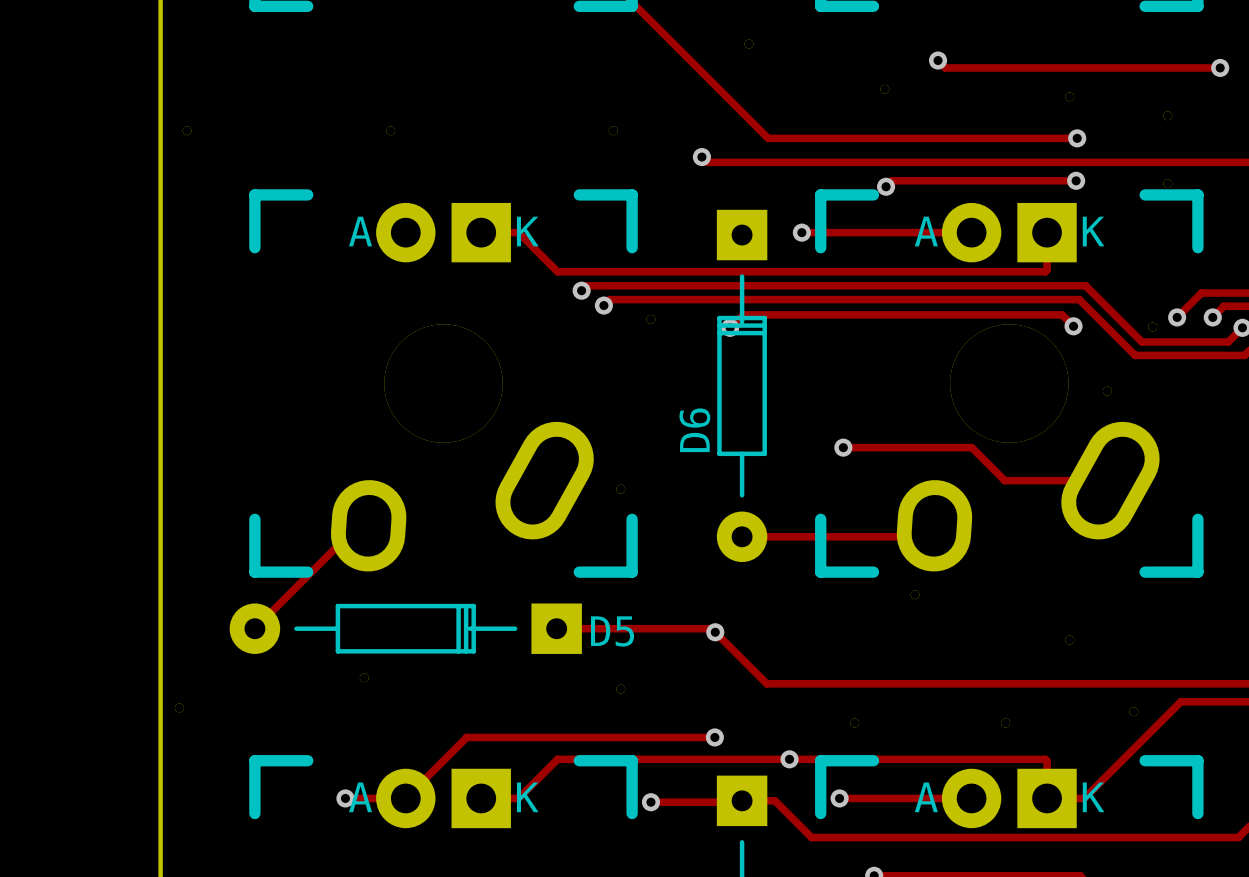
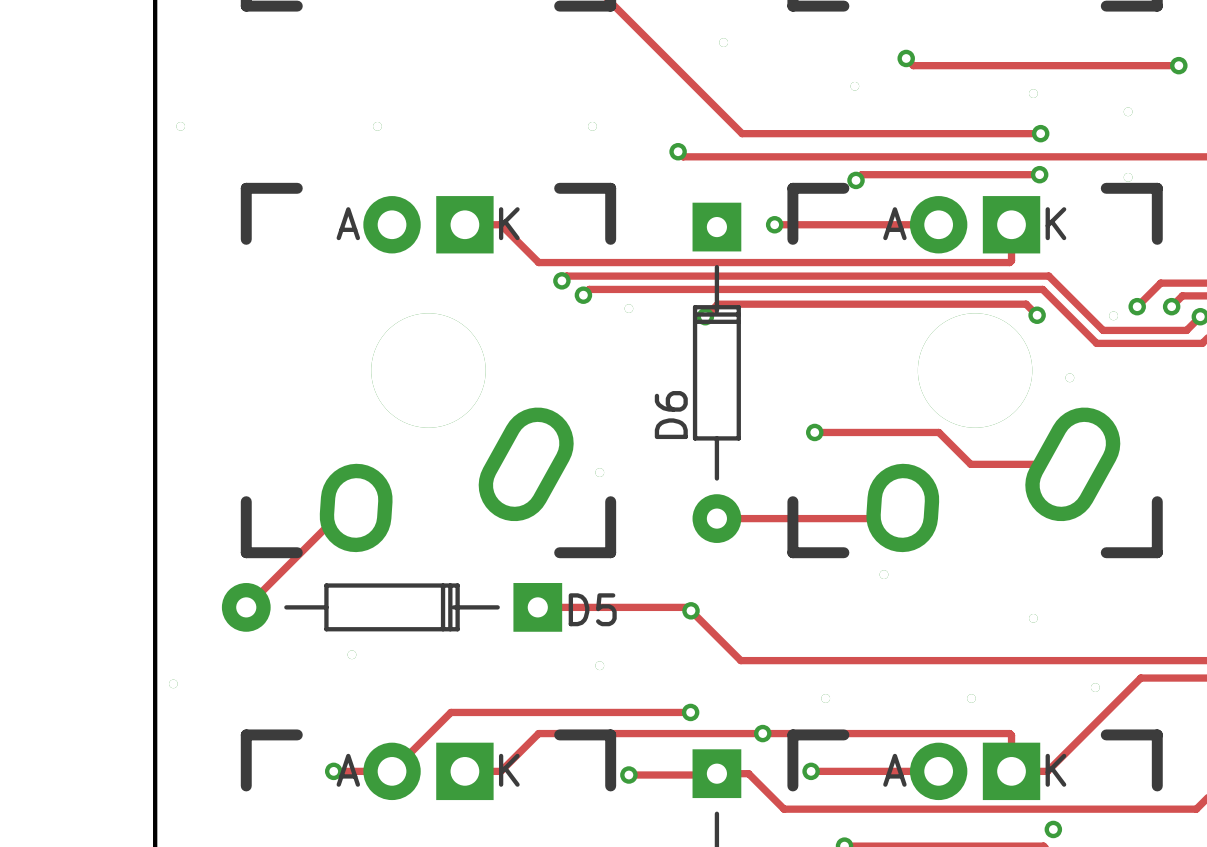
via: none -> (1053, 829)

